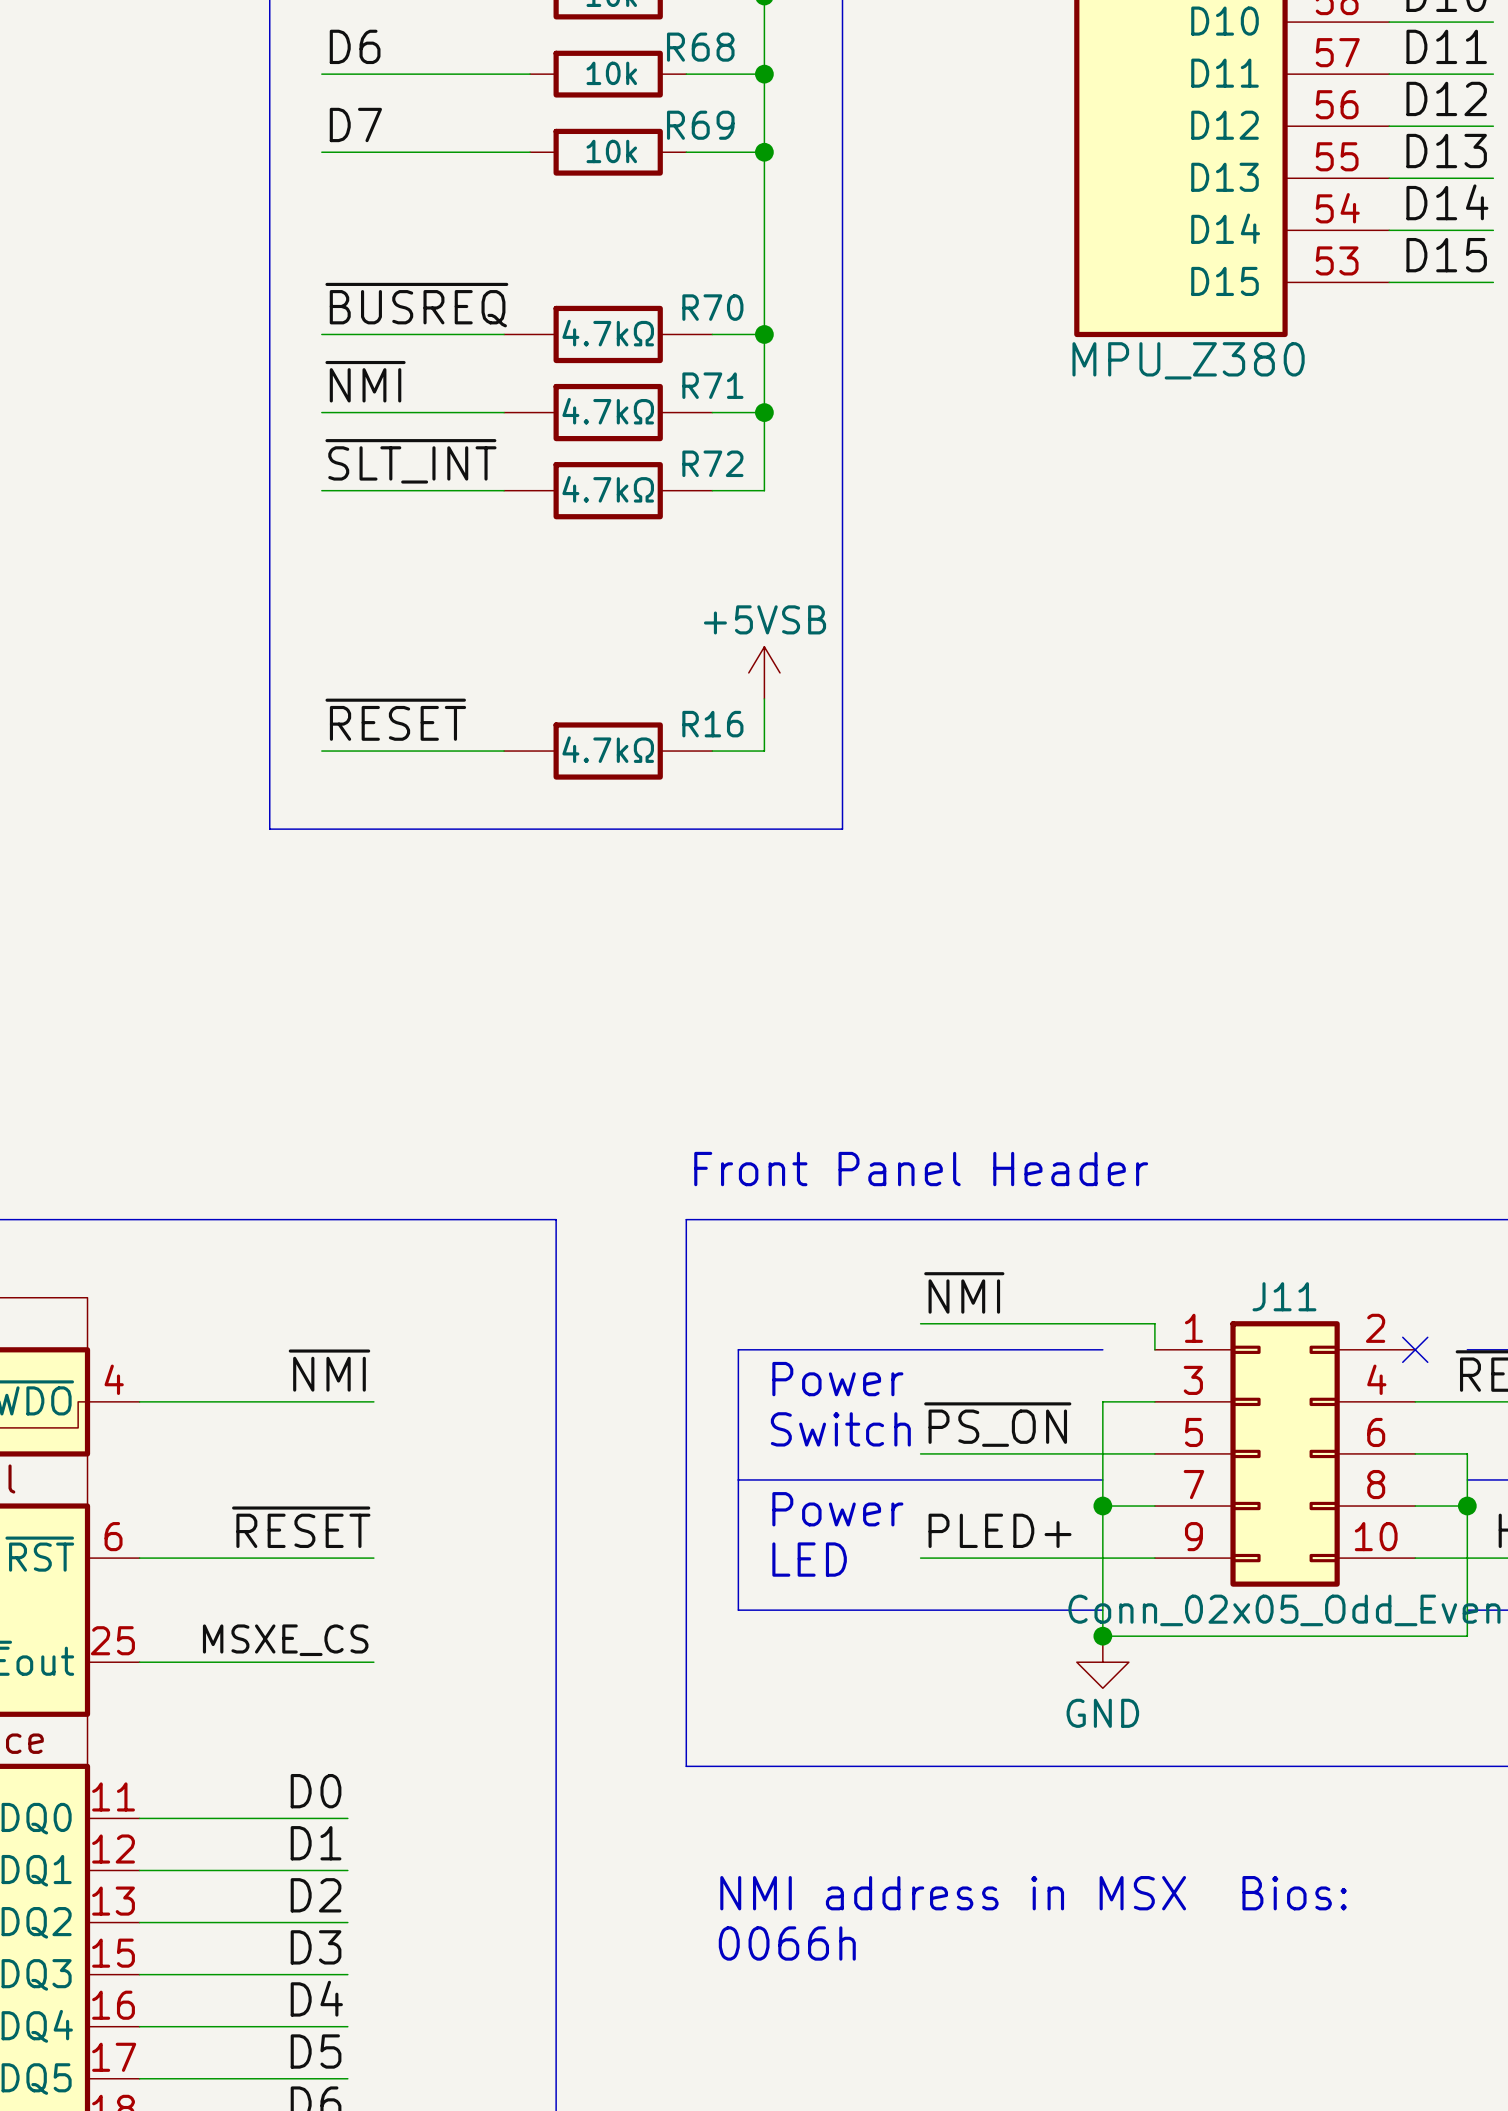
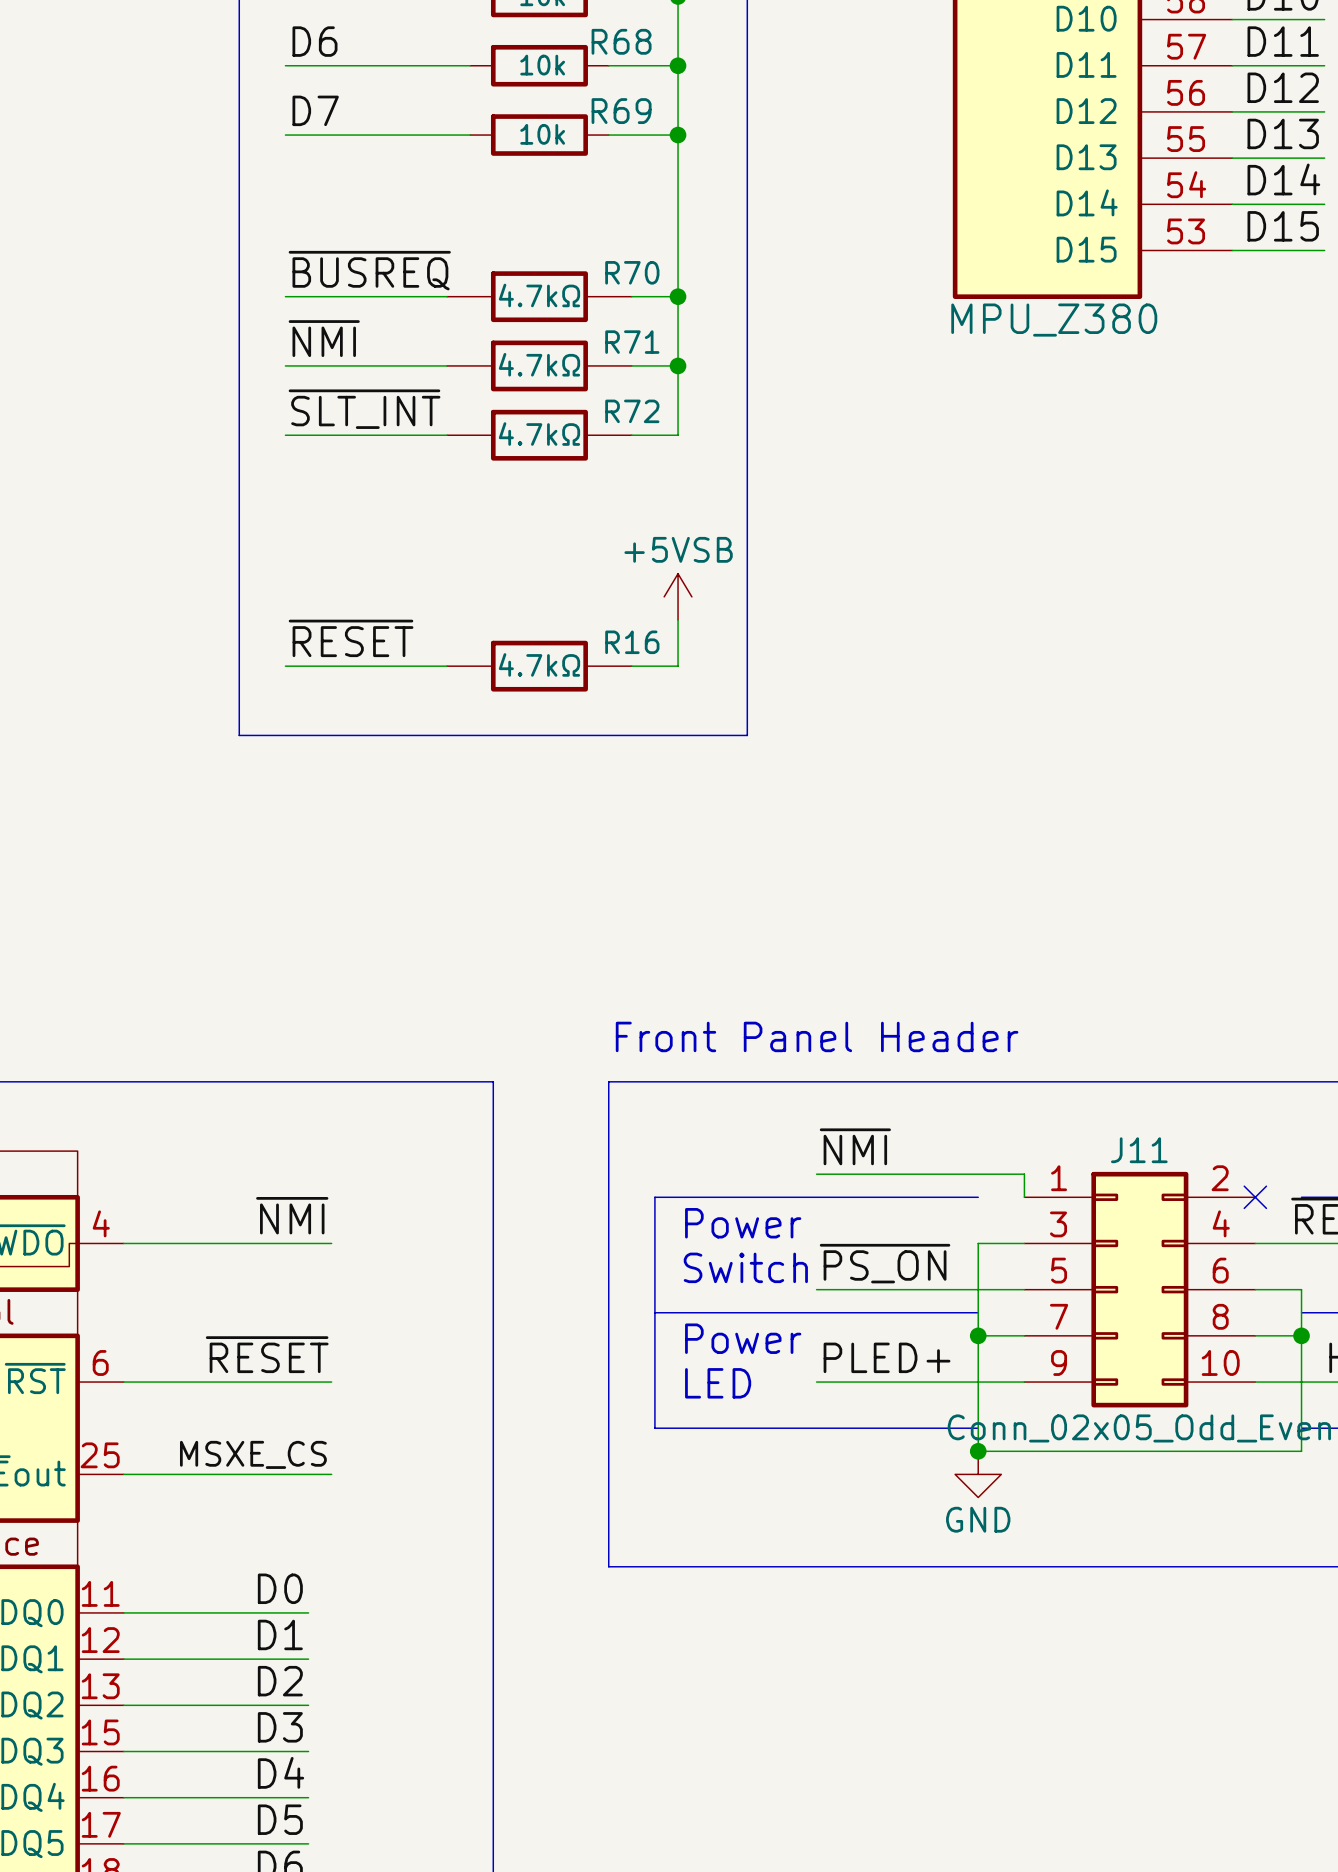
text: NMI address in MSX Bios: (1033, 1893) -> none
text: 0066h (787, 1943) -> none

